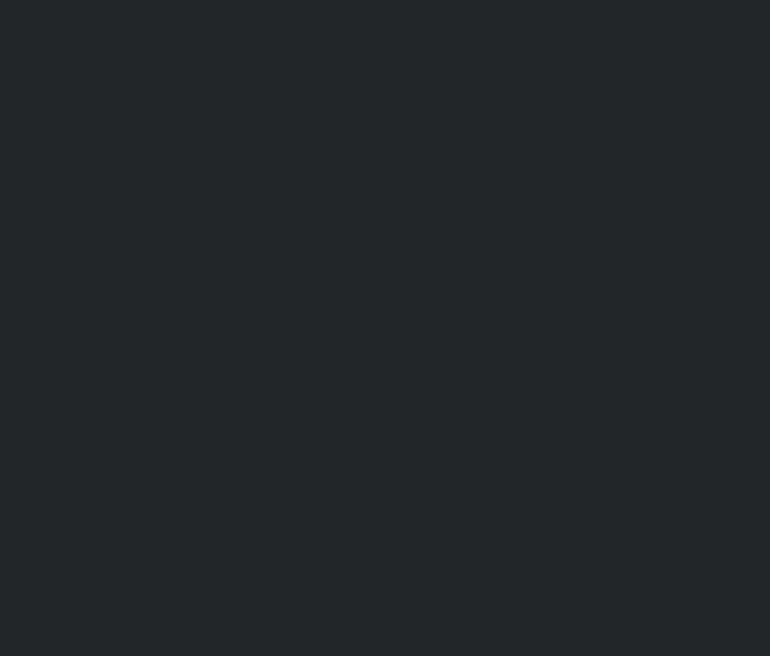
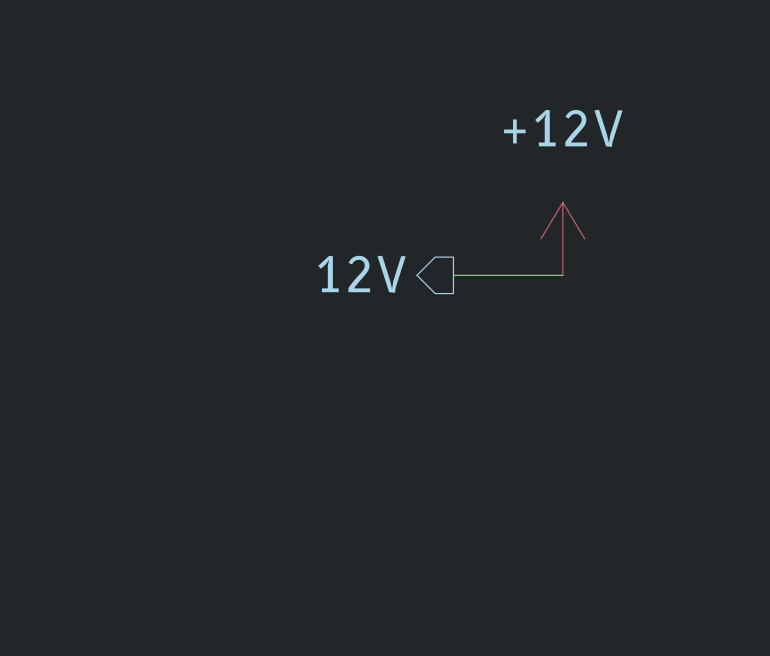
power symbol: none -> +12V (562, 238)
sheet pin: none -> 12V (361, 274)
wire: none -> (453, 275) (562, 275)

